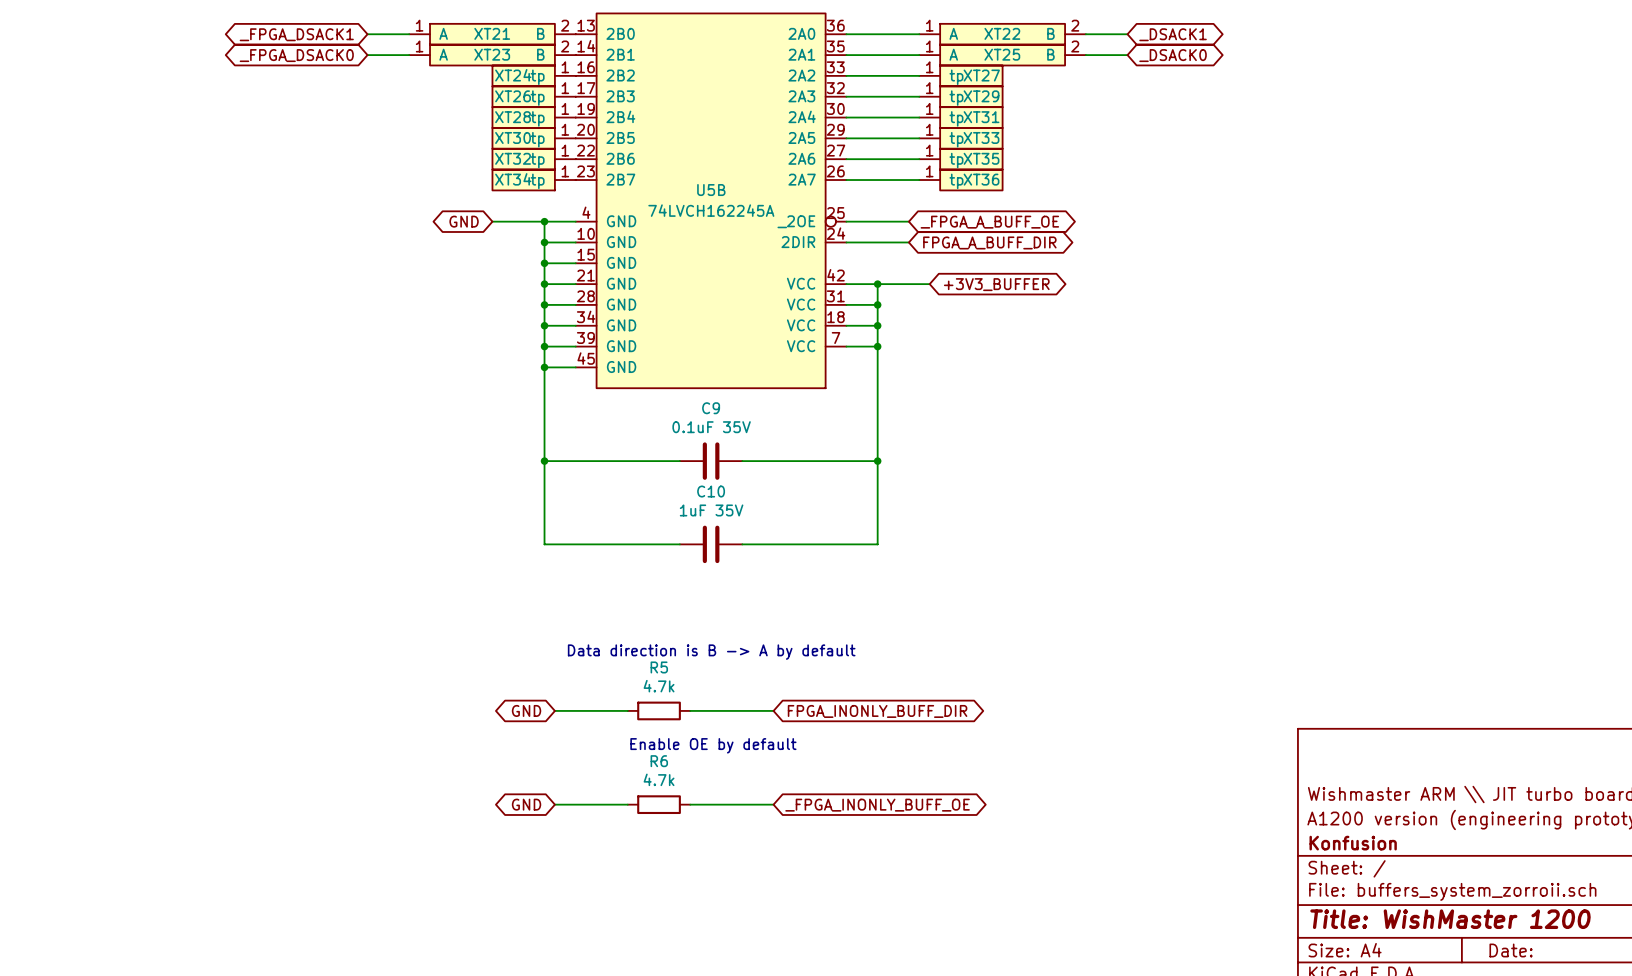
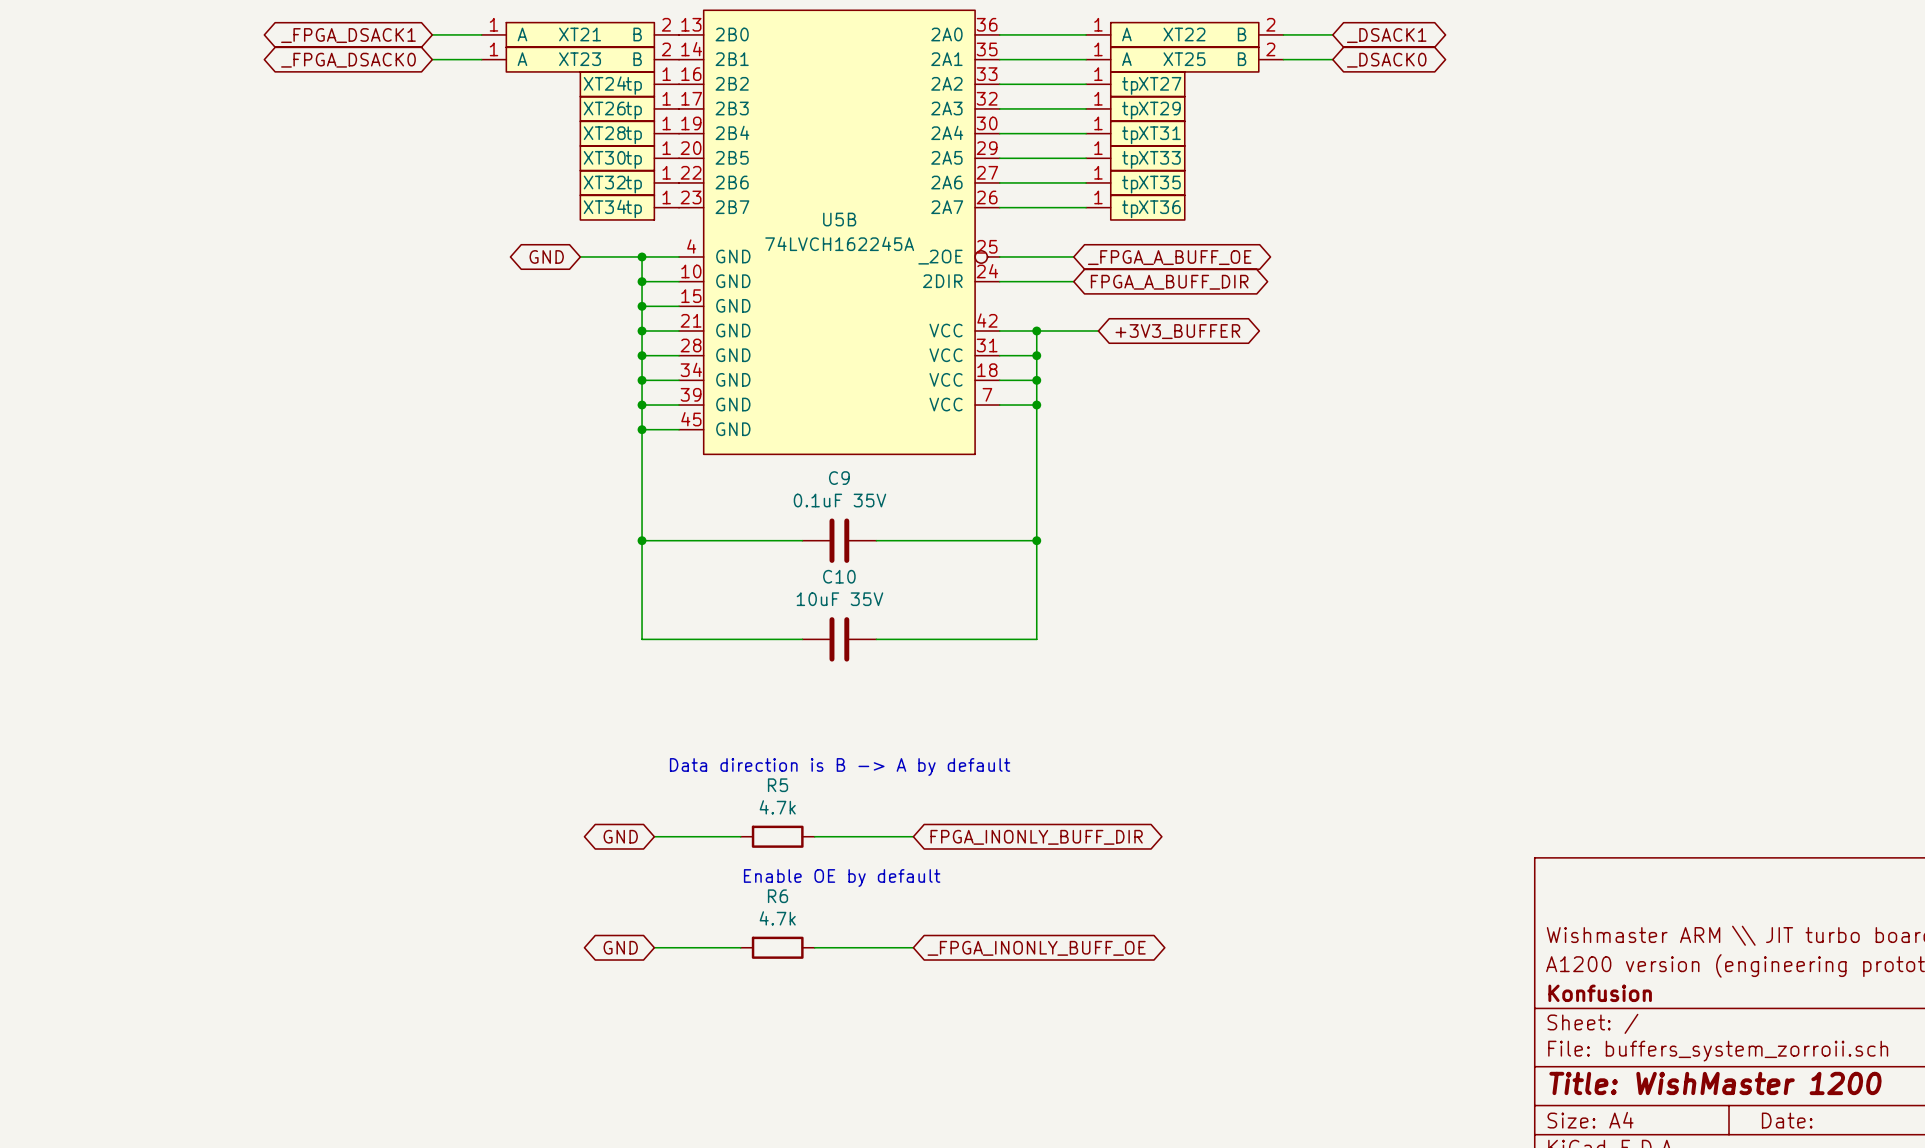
C10 value: 1uF 35V (711, 510) -> 10uF 35V (839, 599)

